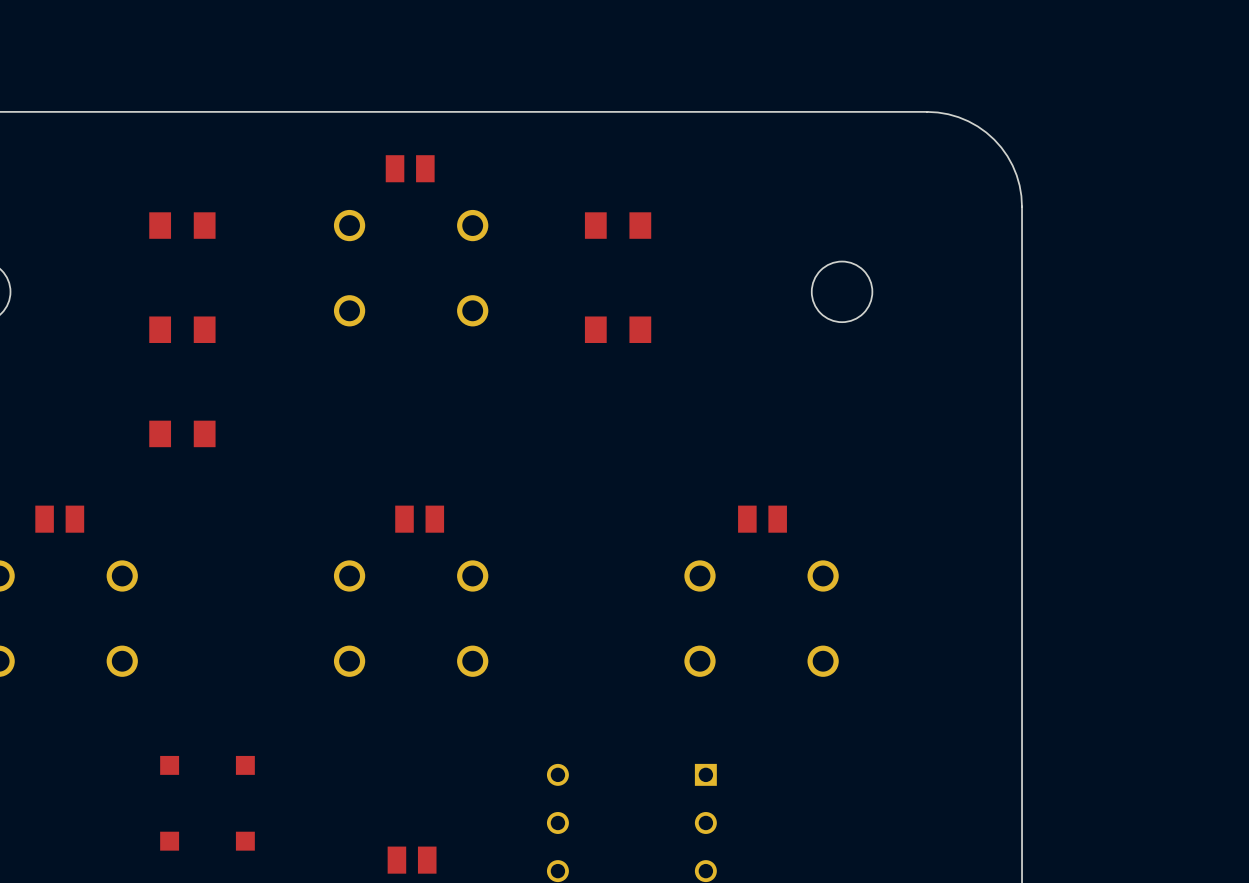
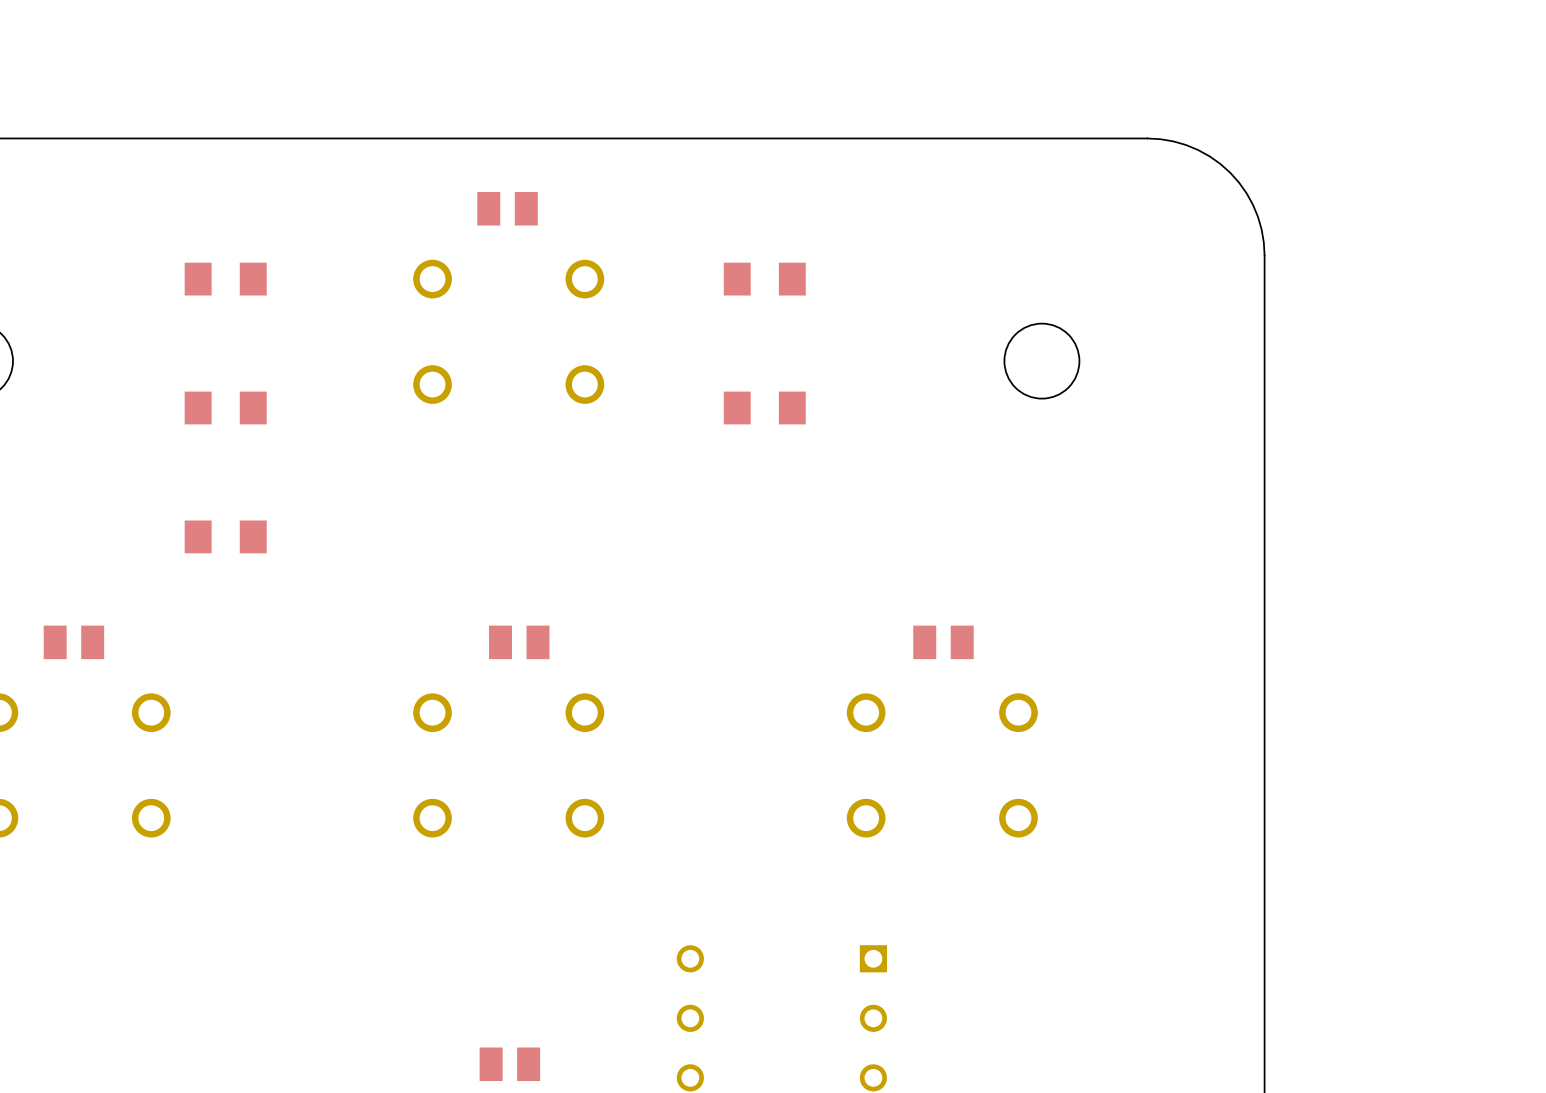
part: (169, 765) -> none
part: (245, 765) -> none
part: (169, 841) -> none
part: (245, 841) -> none

